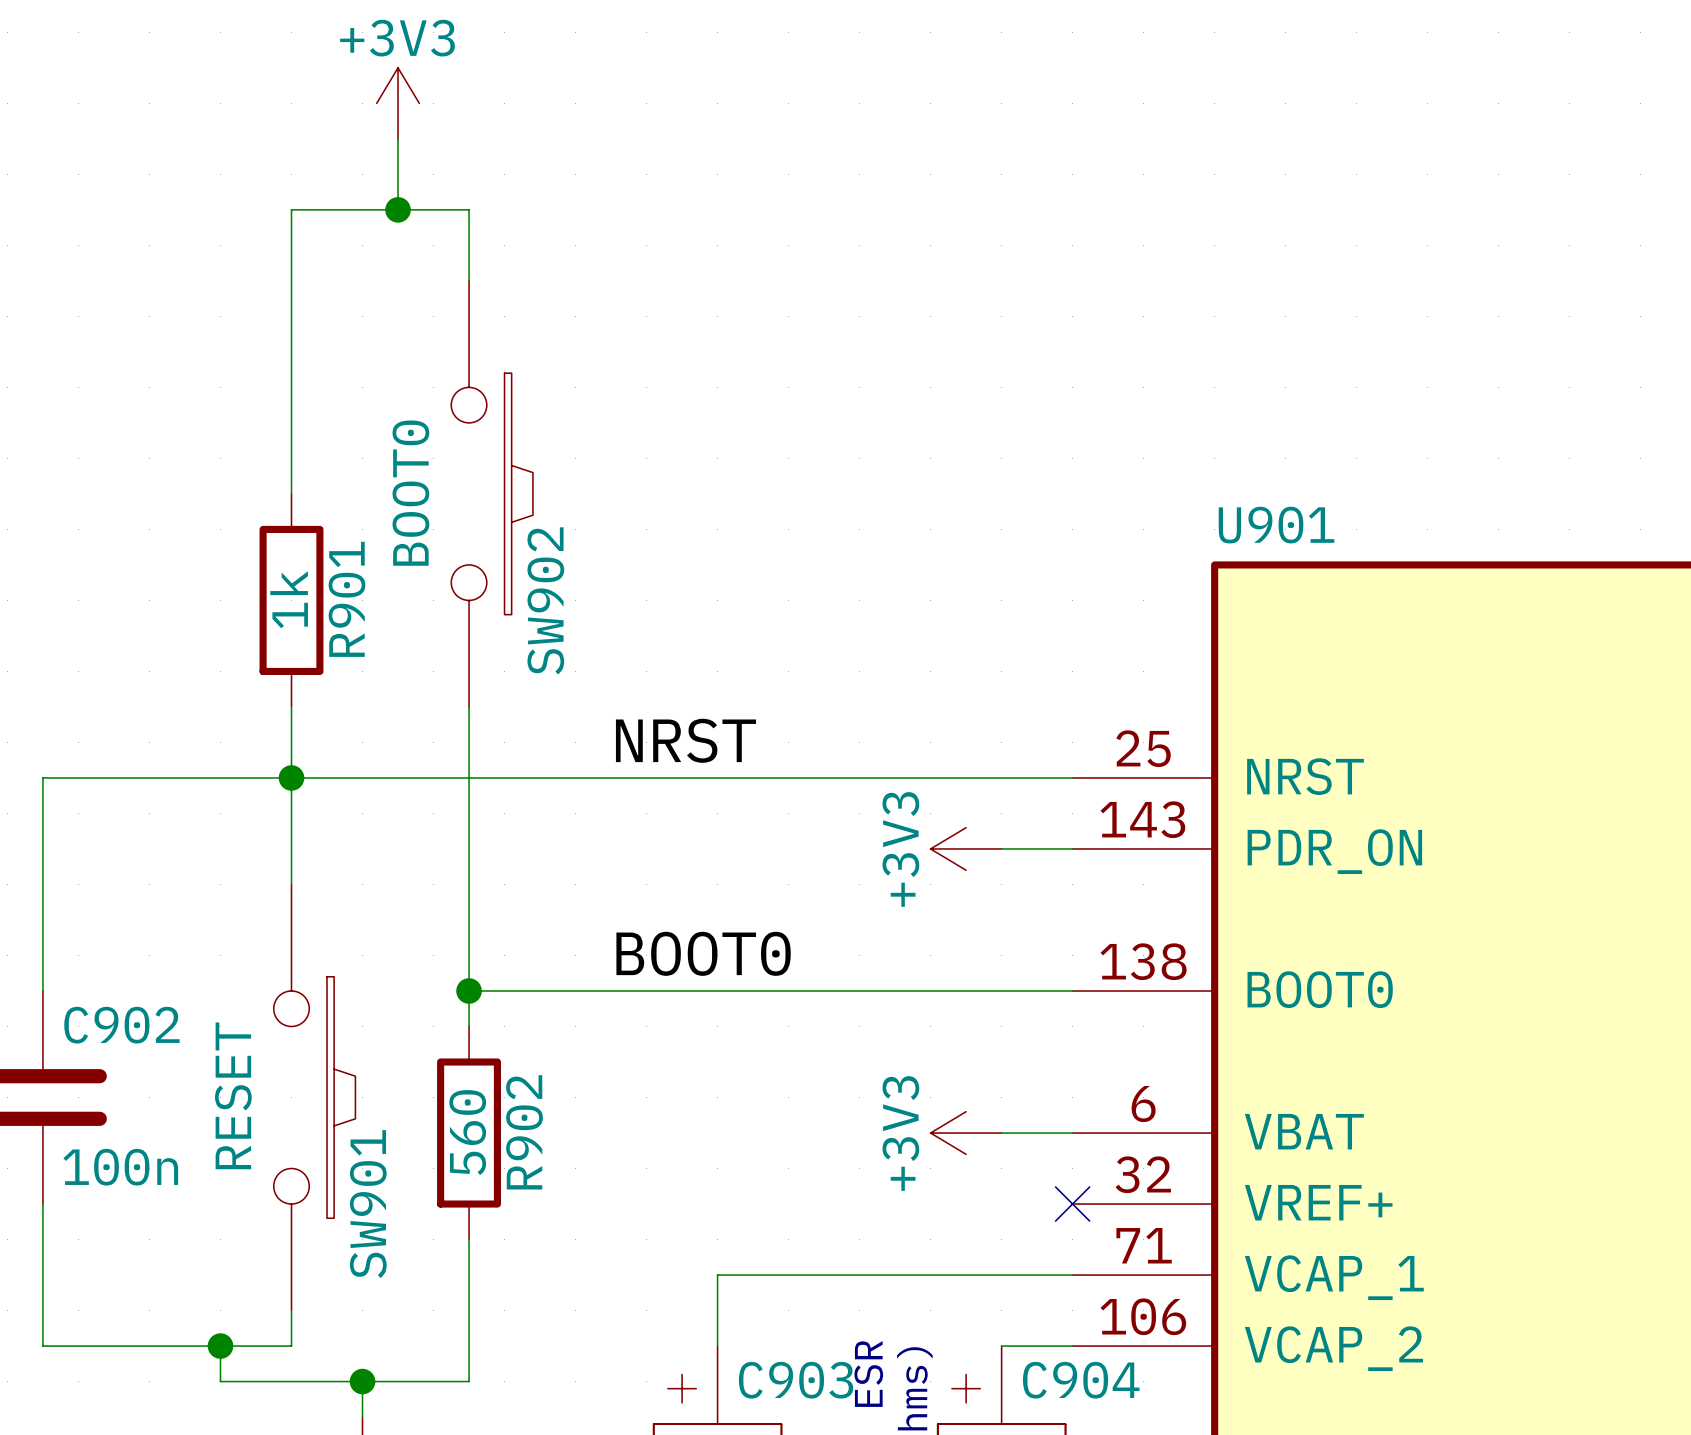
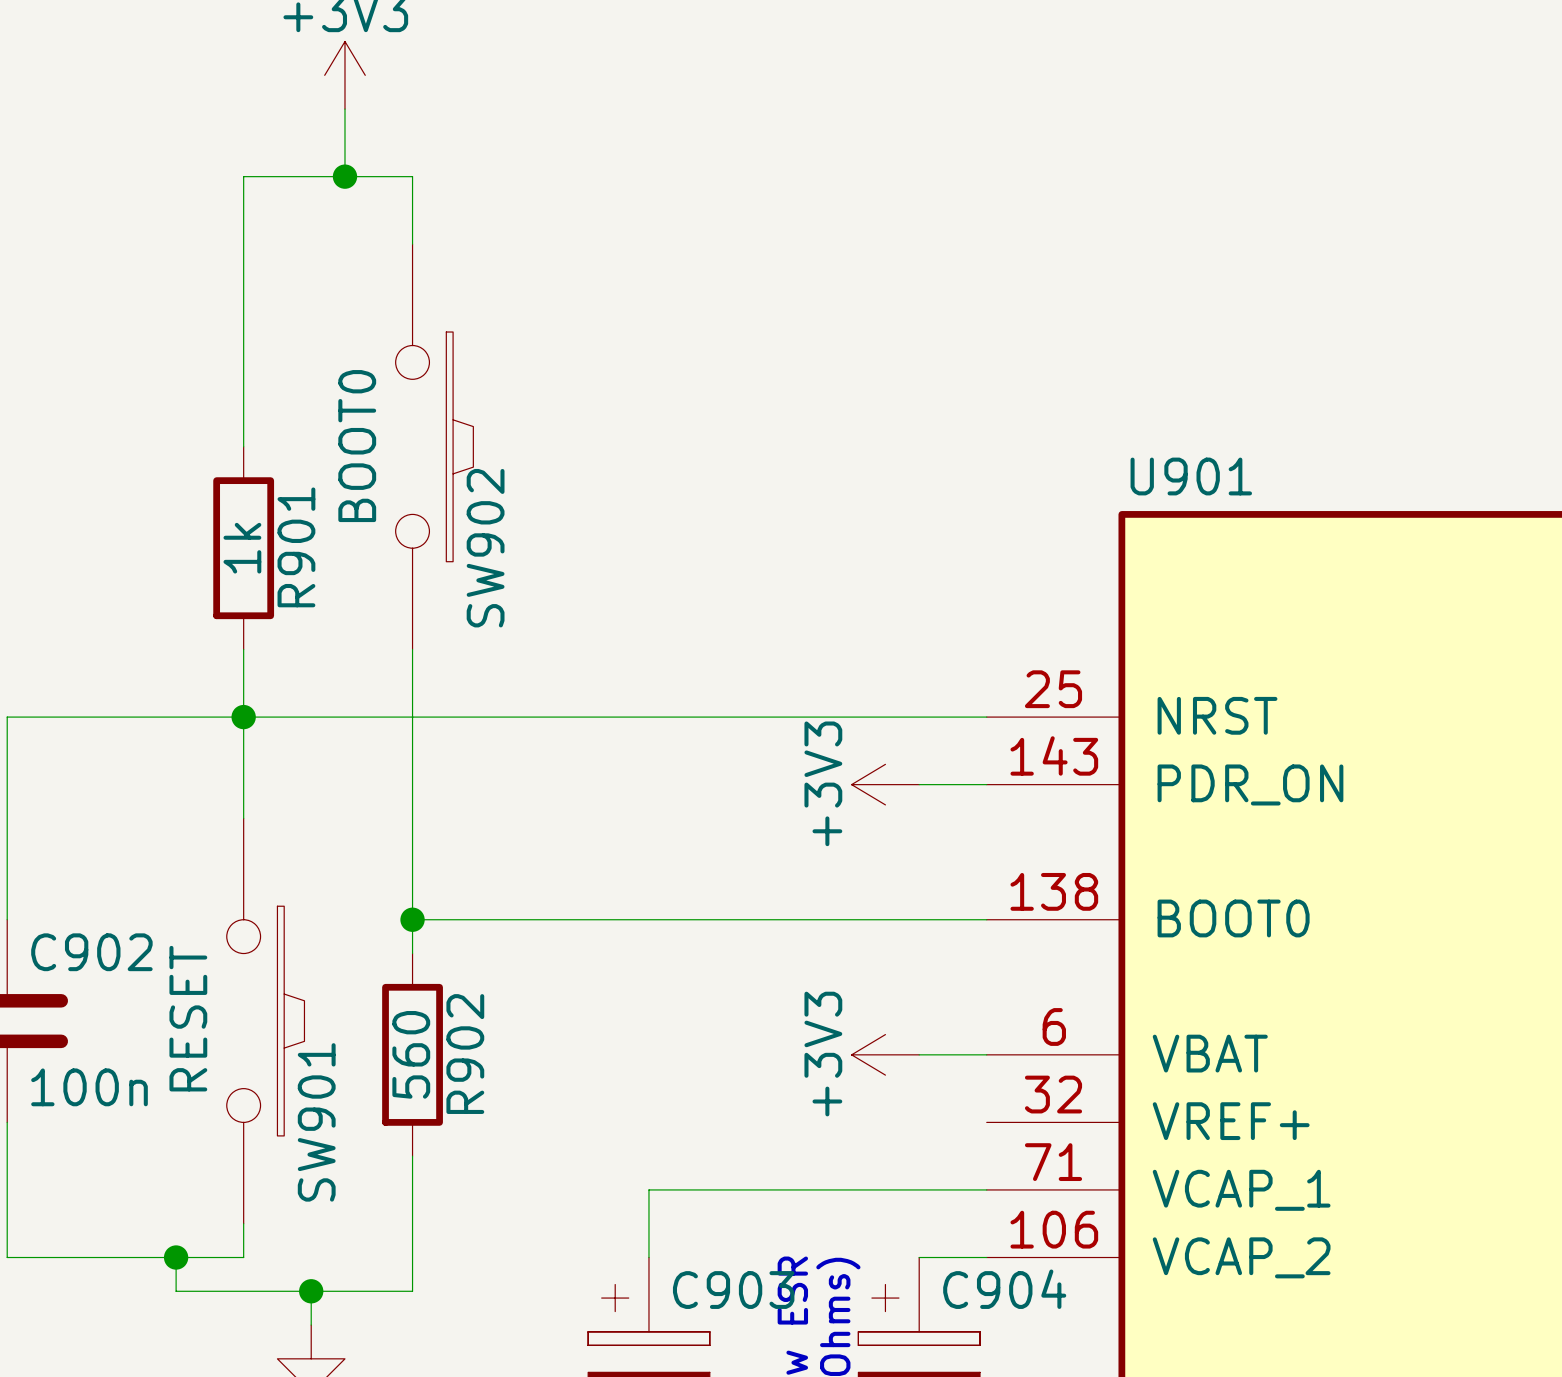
label: NRST (685, 740) -> none
label: BOOT0 (703, 953) -> none
no-connect mark: (1072, 1204) -> none

